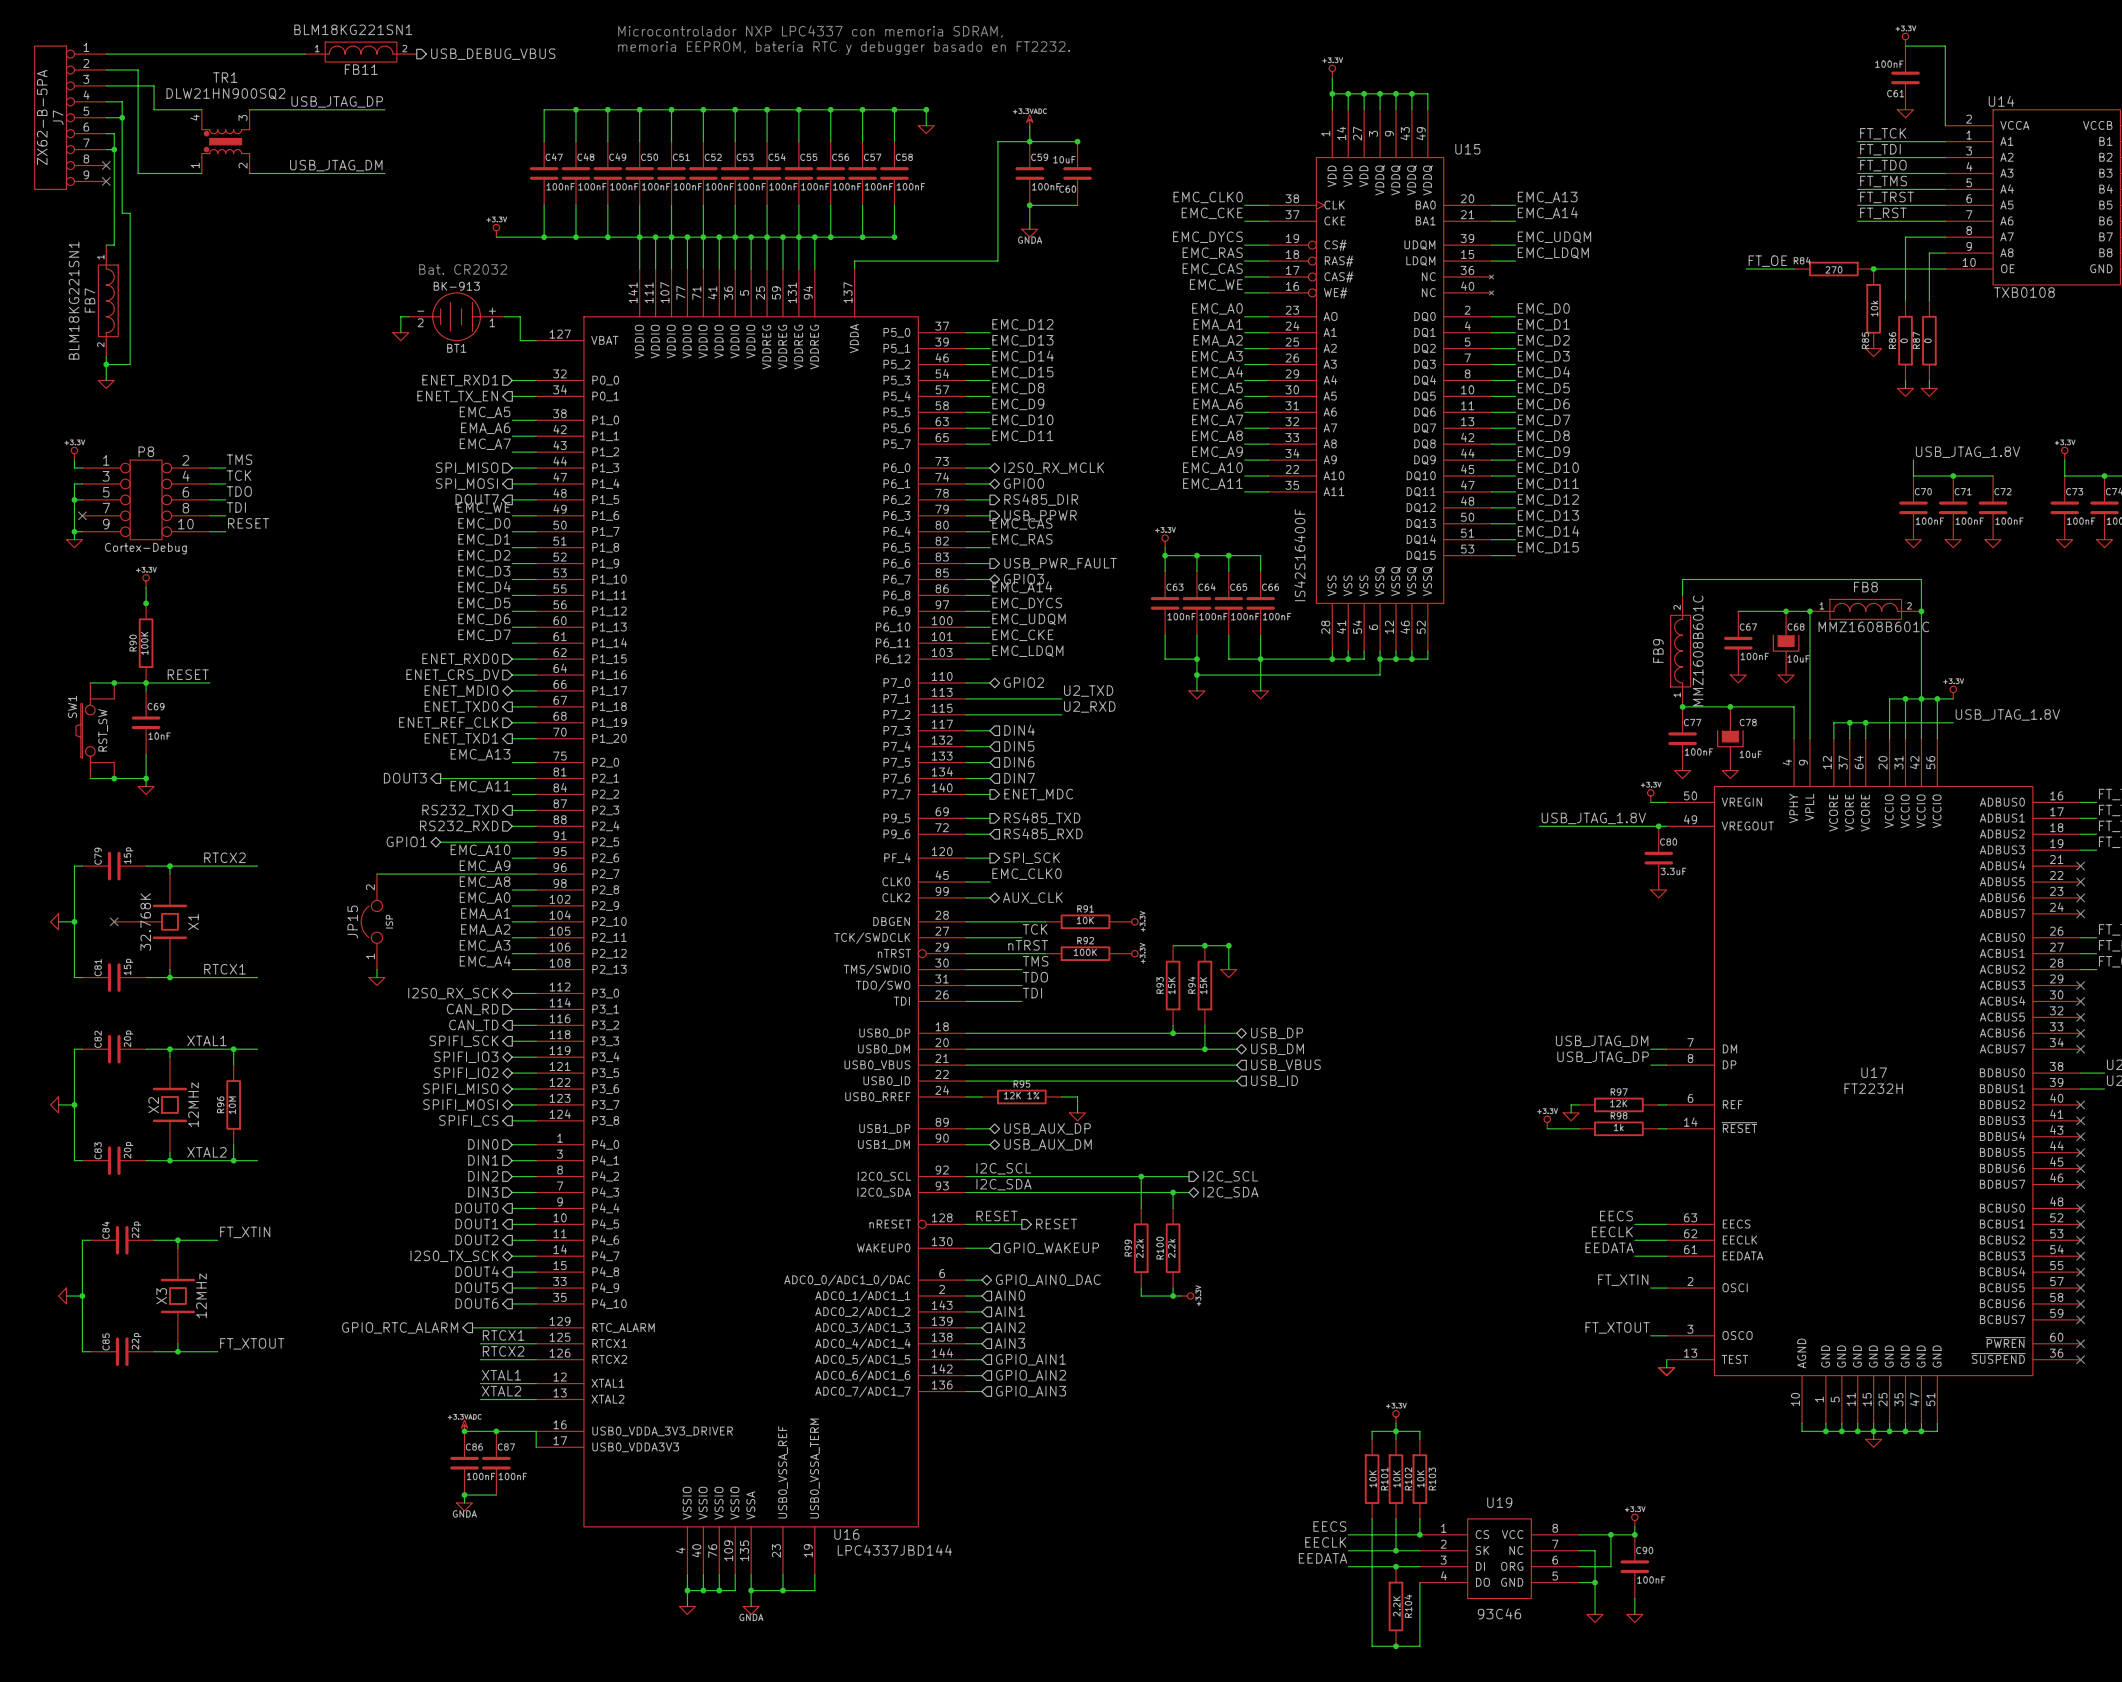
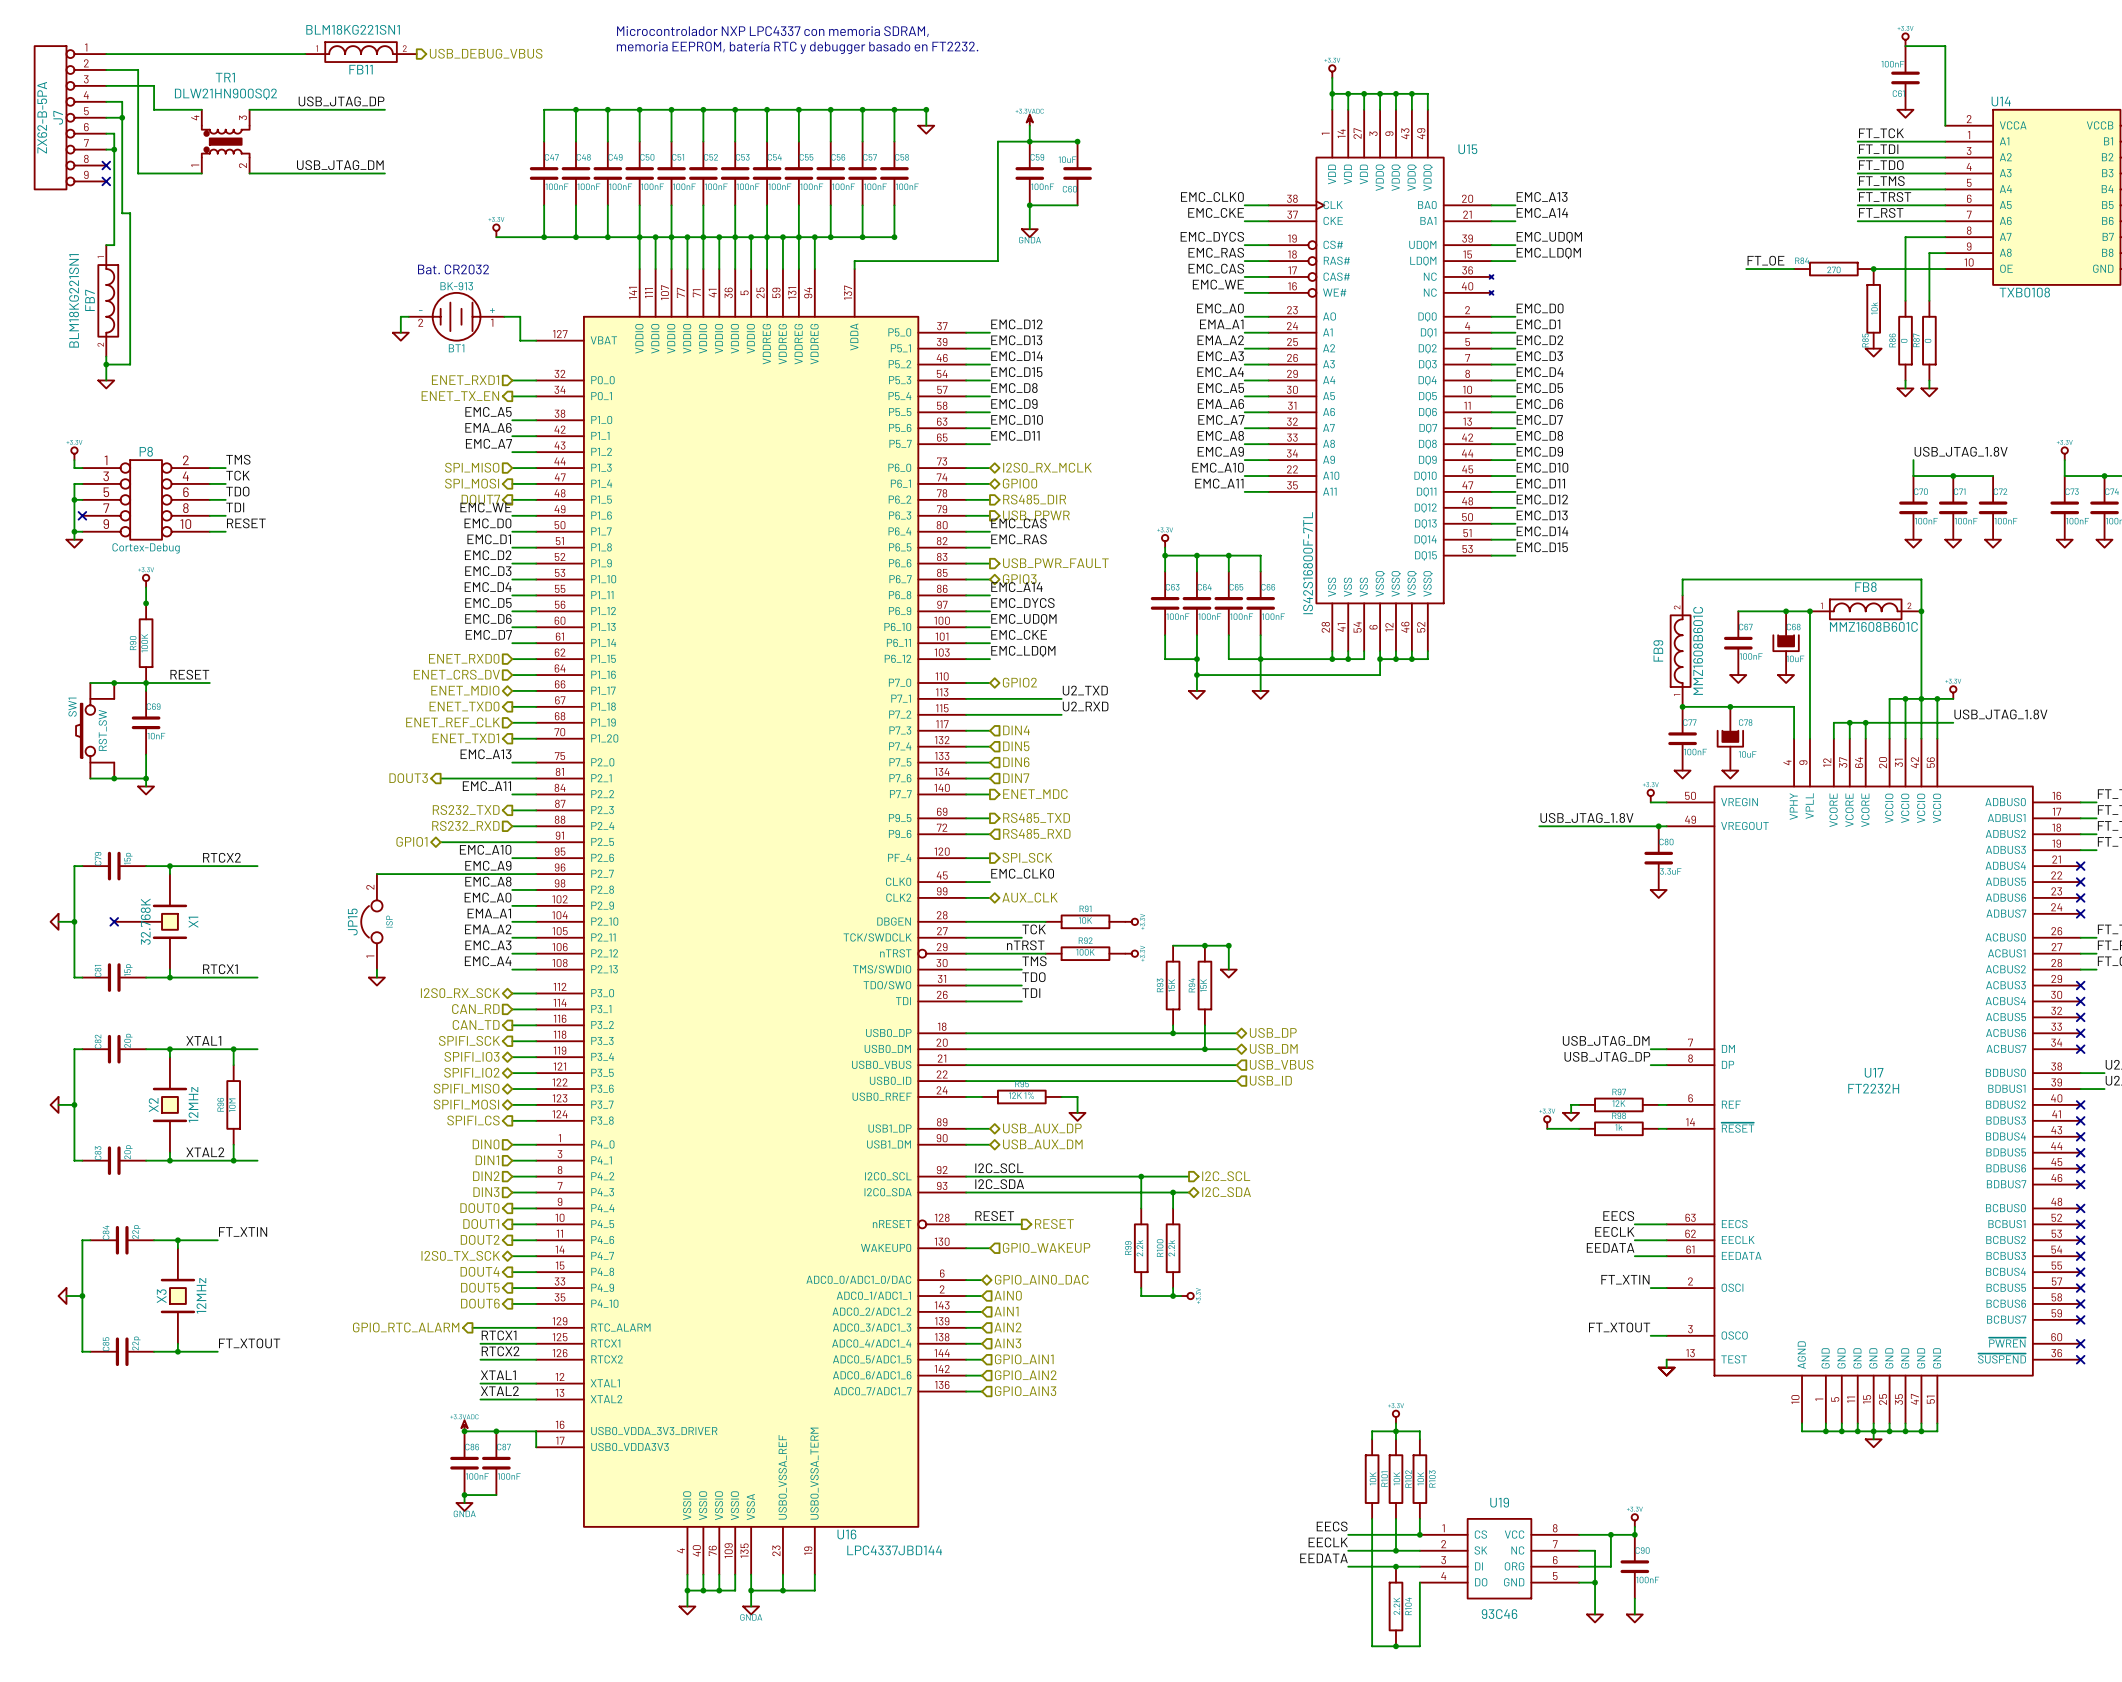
U15 value: IS42S16400F (1299, 555) -> IS42S16800F-7TL (1308, 563)

